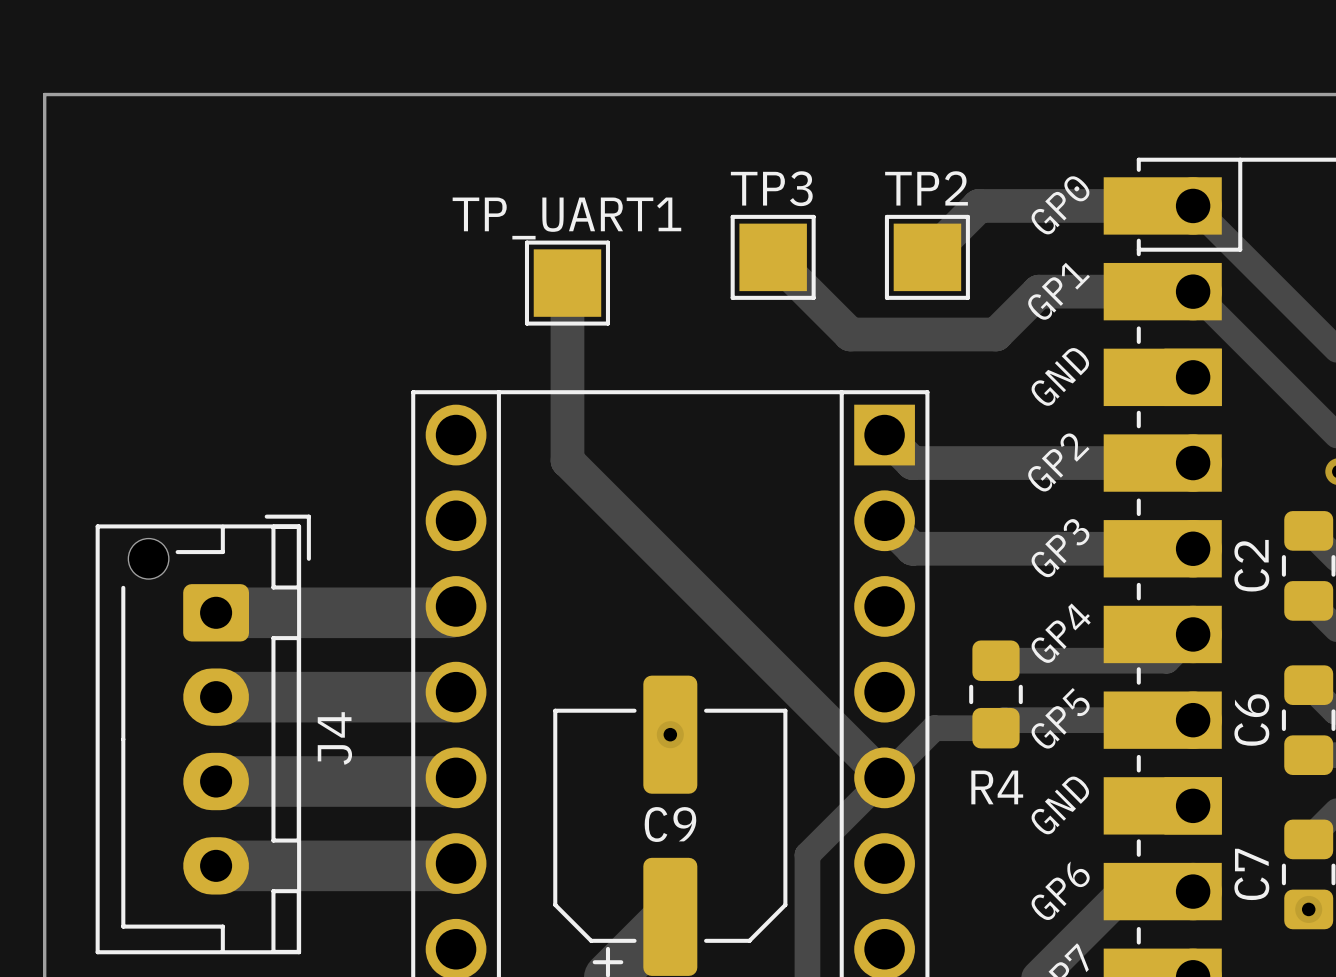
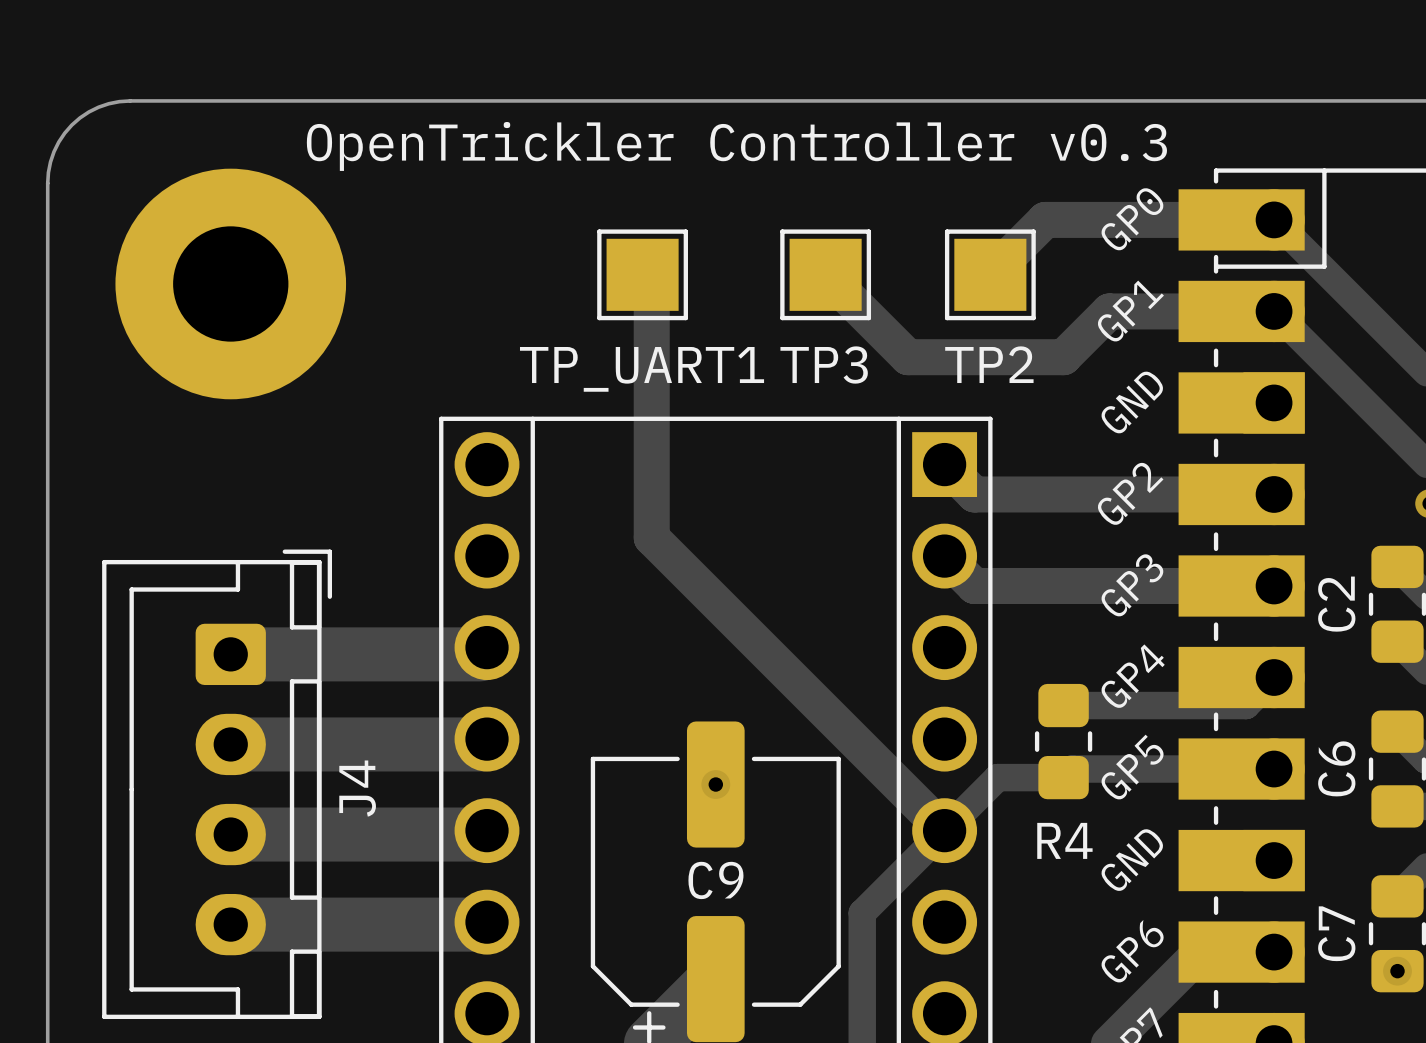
board edge: (121, 94) (44, 94) (44, 171) -> (130, 100) (98, 107) (71, 125) (53, 151) (47, 183)
text: none -> OpenTrickler Controller v0.3 (736, 146)
TP3 name position: TP3 (771, 188) -> TP3 (824, 365)
TP2 name position: TP2 (926, 188) -> TP2 (989, 364)
TP_UART1 name position: TP_UART1 (566, 218) -> TP_UART1 (642, 369)
part: none -> (230, 283)
track: (567, 283) (567, 460) (610, 503) -> (642, 274) (651, 283) (651, 537)
TP_UART1 position: (567, 283) -> (642, 274)
J4 footprint: [95, 514, 311, 955] -> [102, 549, 333, 1020]

